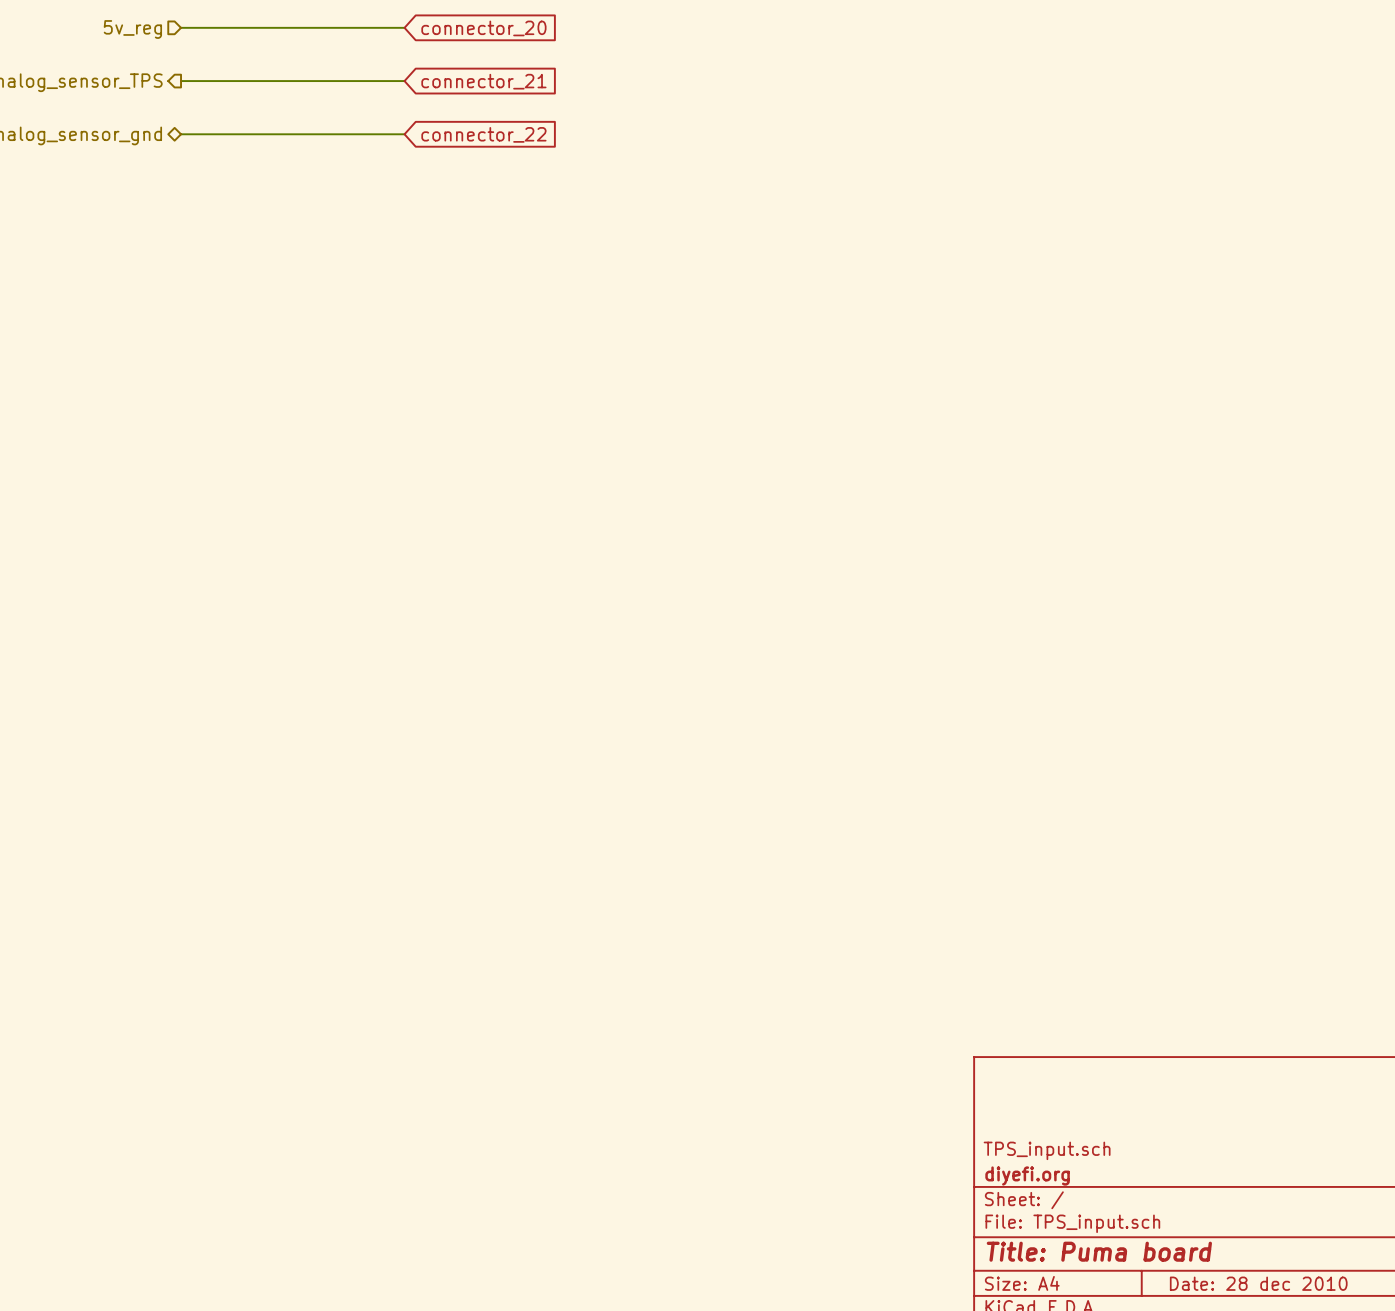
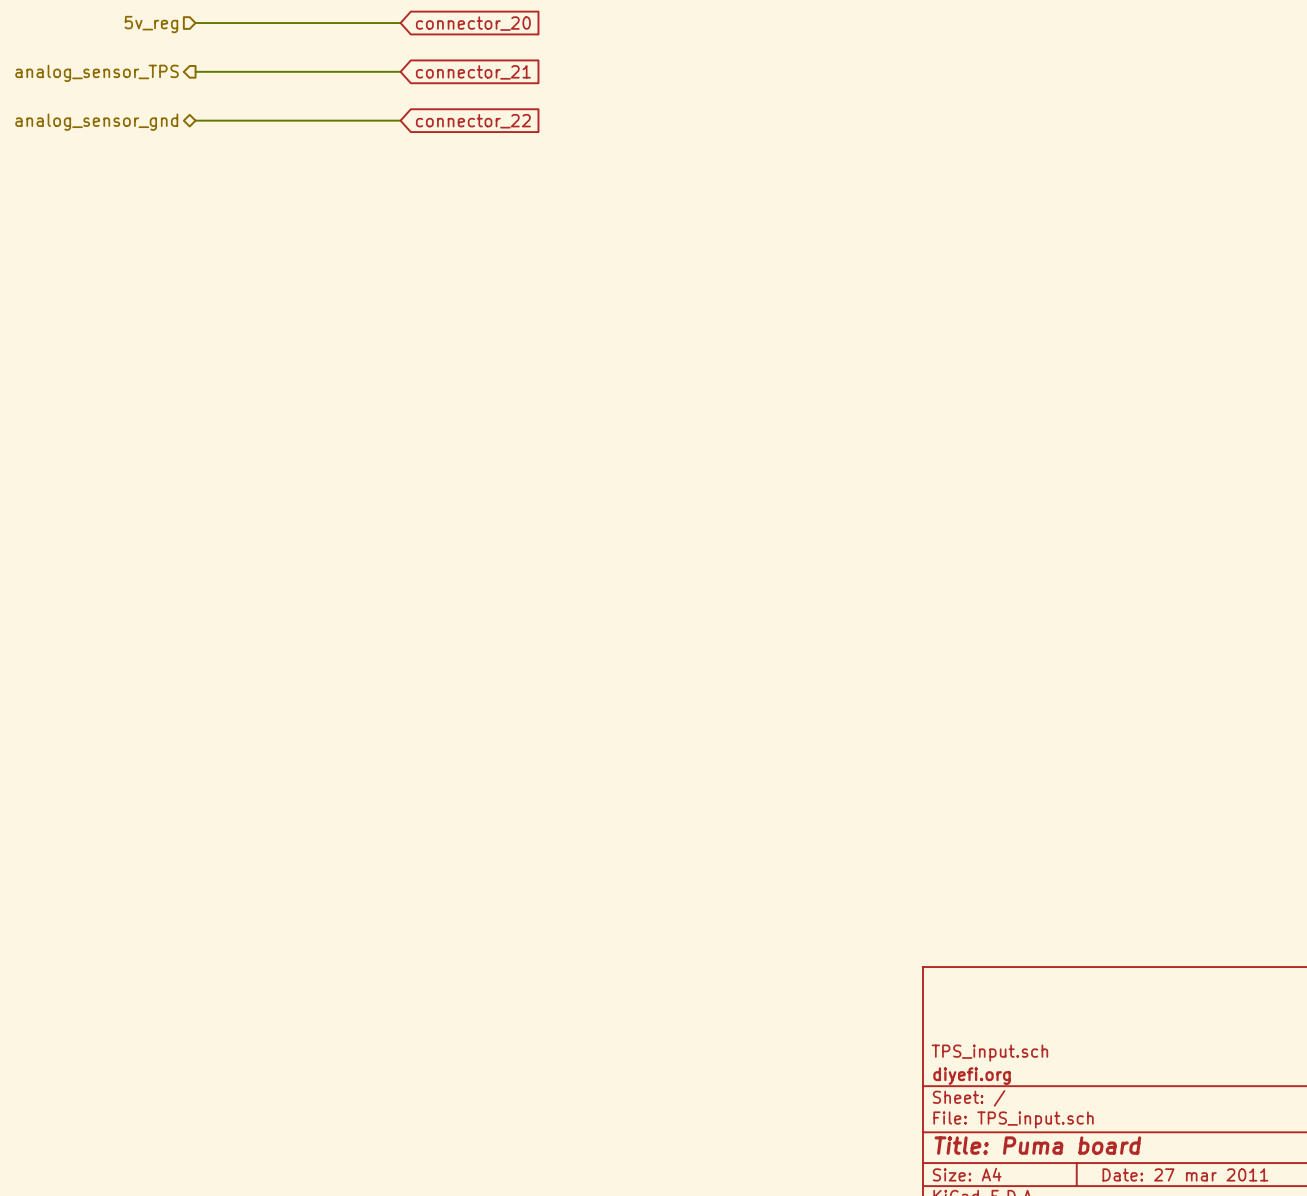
title block: Date: 28 dec 2010 (1258, 1283) -> Date: 27 mar 2011 (1185, 1174)

